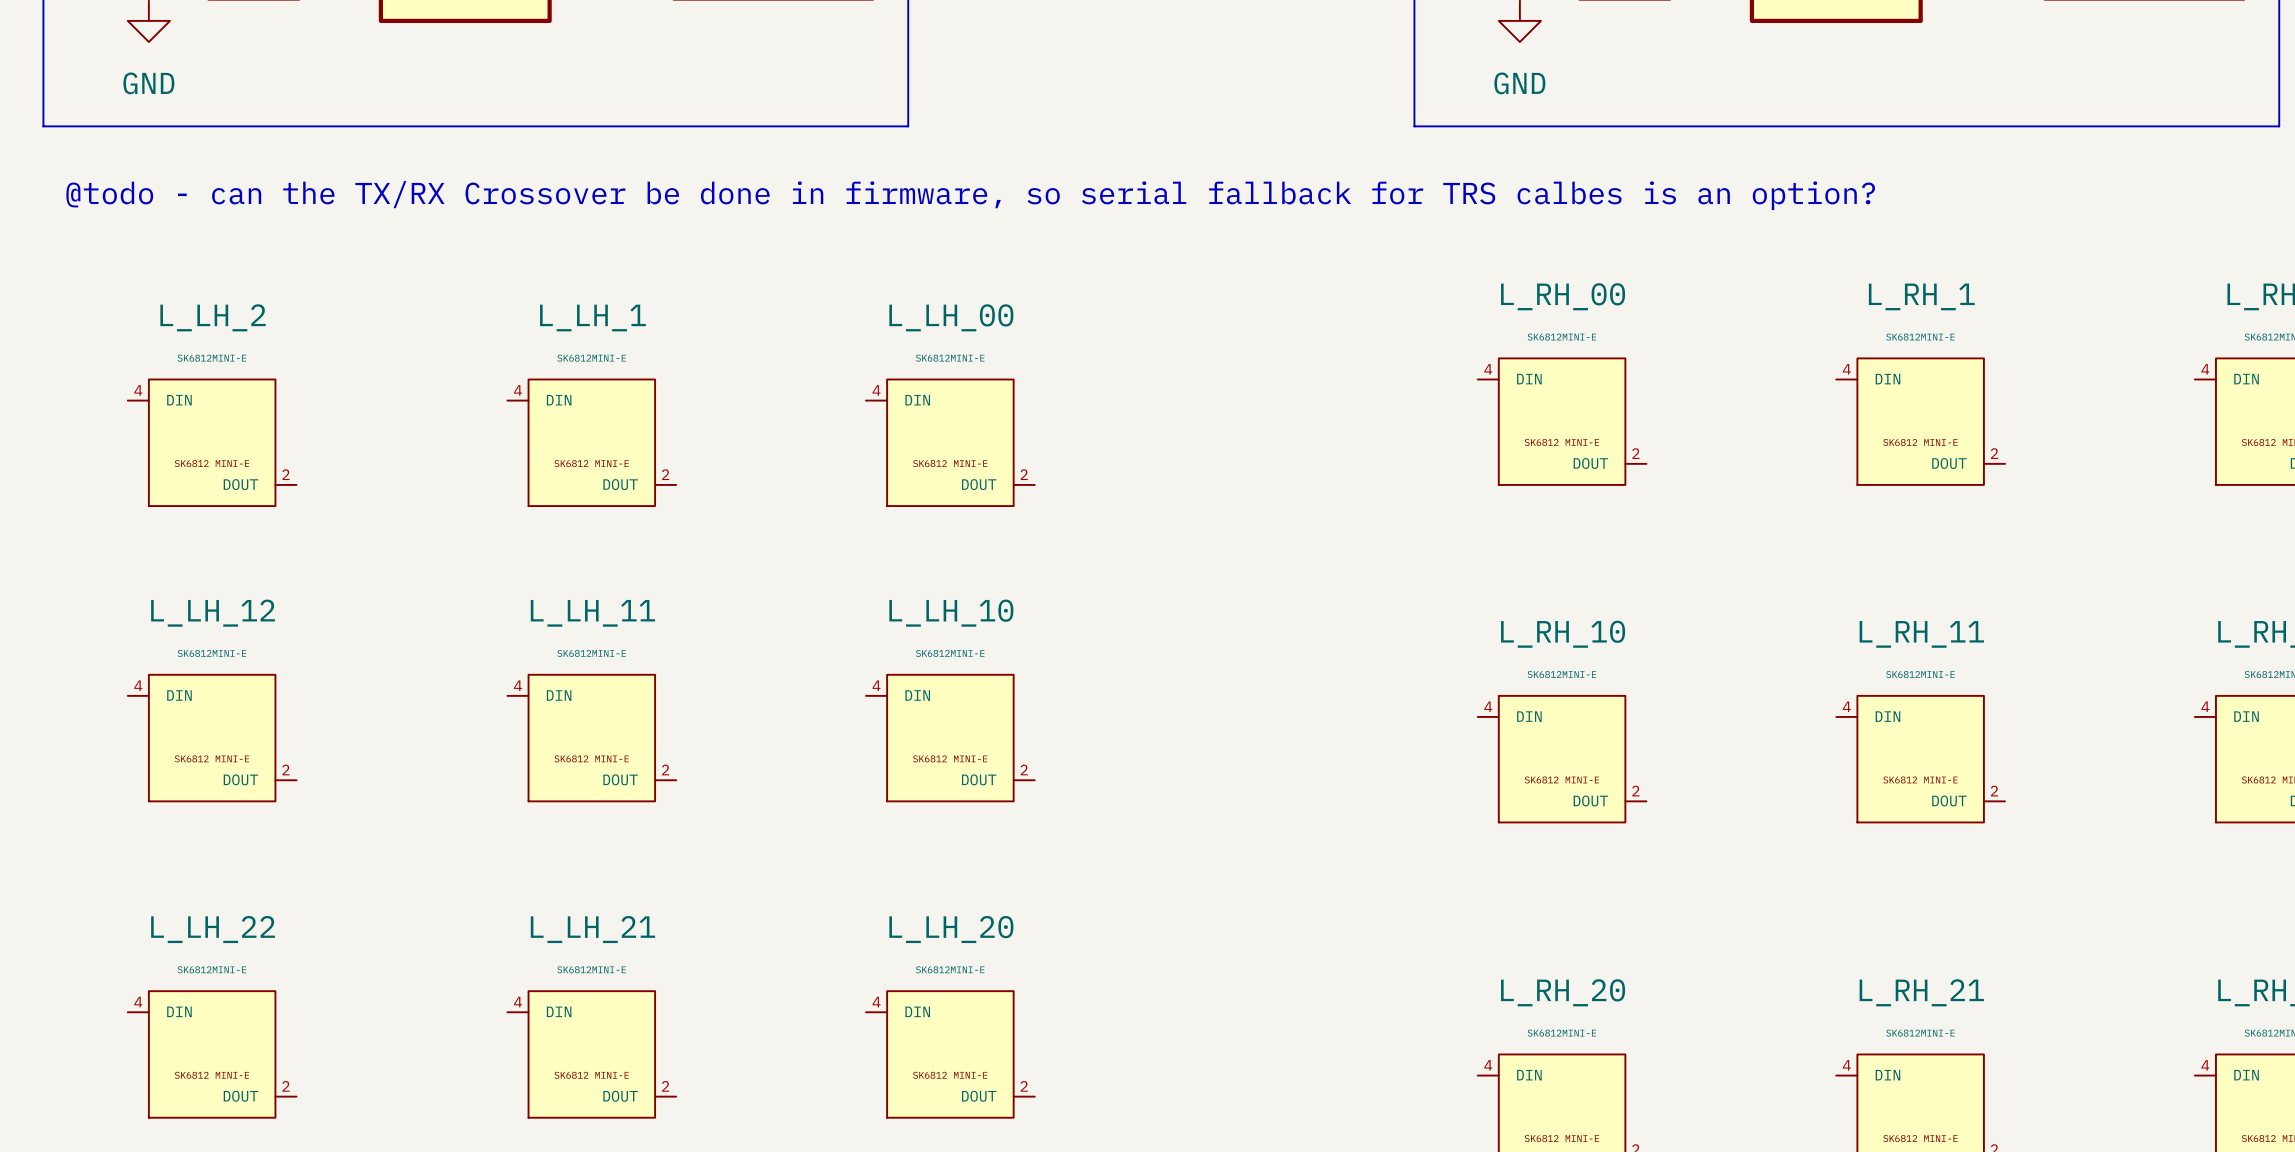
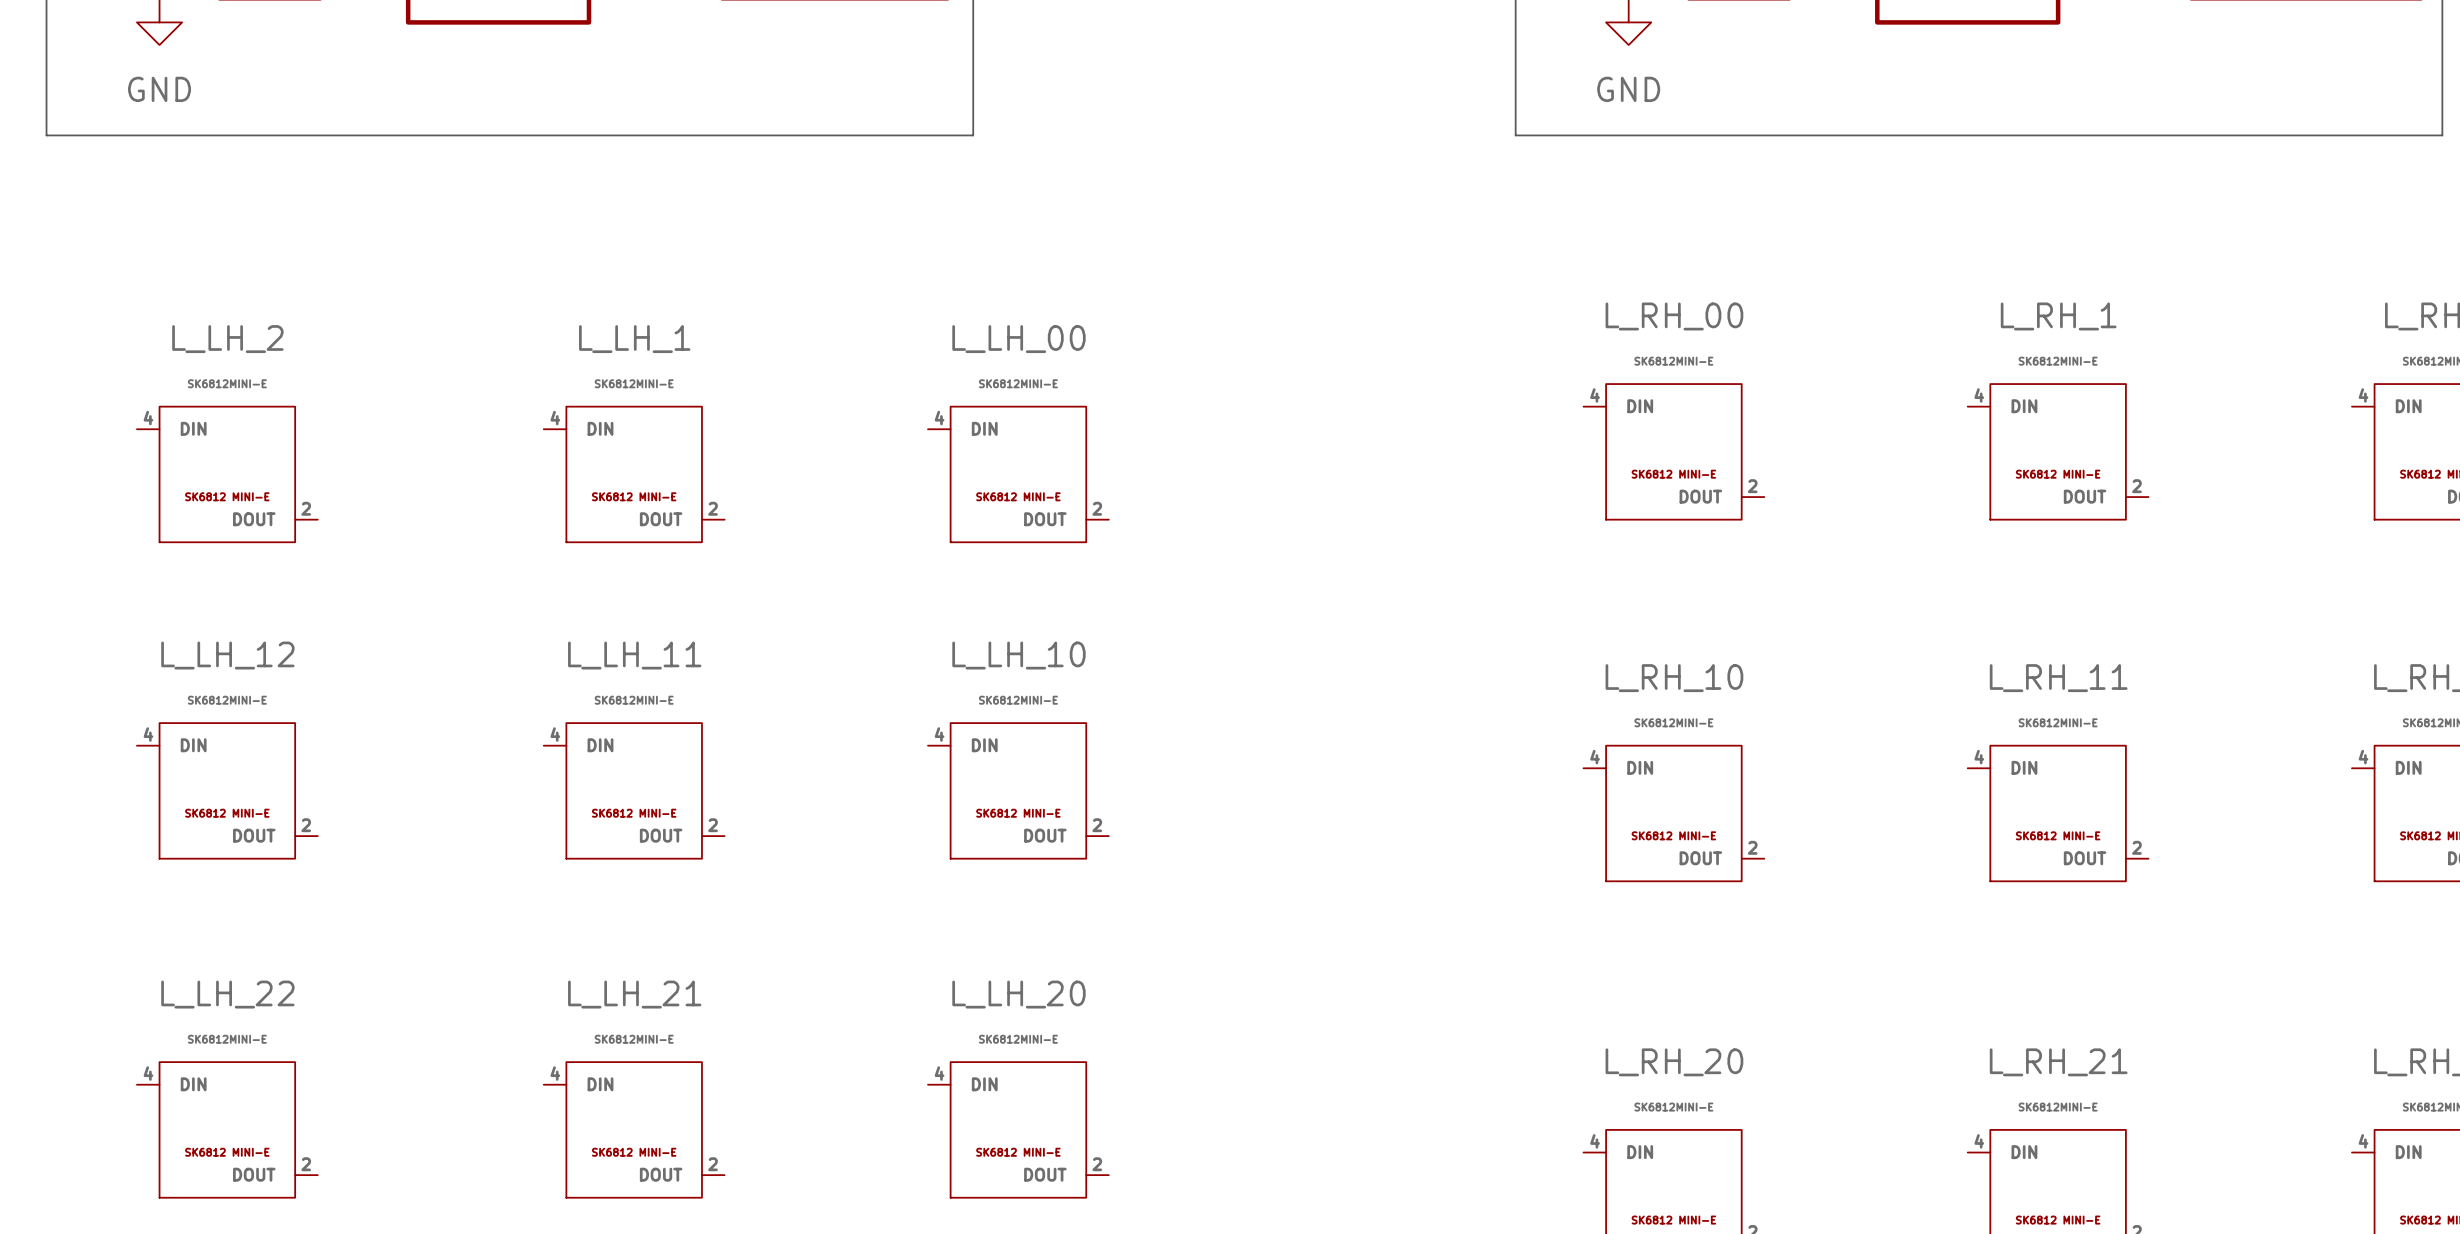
text: @todo - can the TX/RX Crossover be done in firmware, so serial fallback for TRS calbes is an option? (970, 195) -> none

